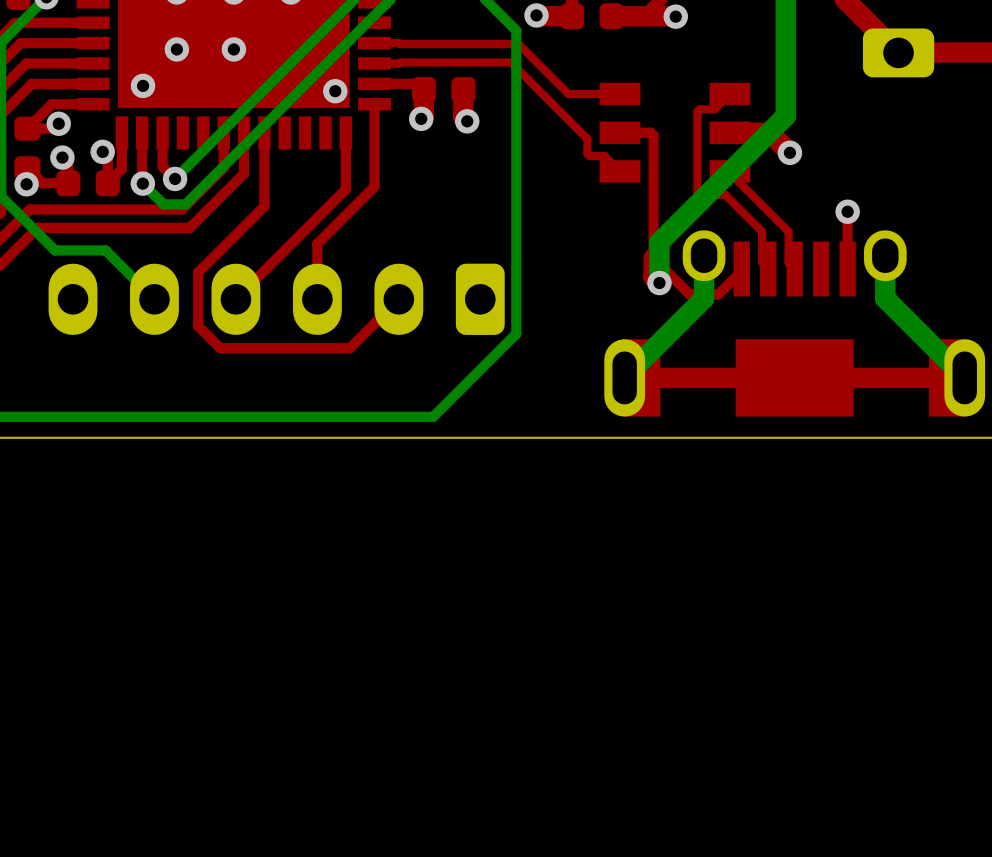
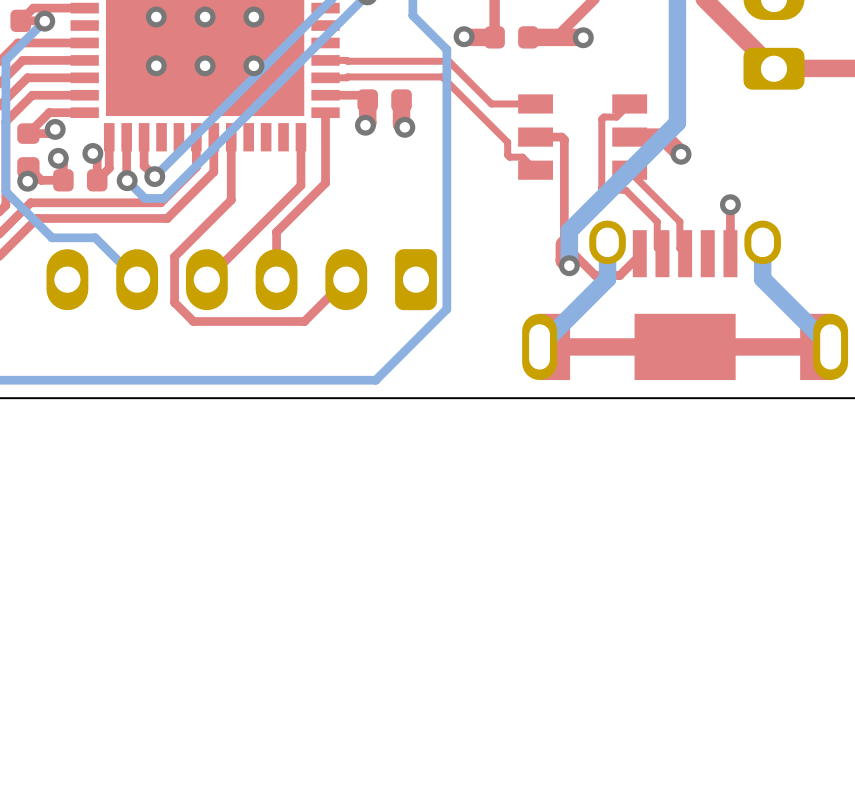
via: (143, 85) -> none
via position: (335, 91) -> (253, 65)

